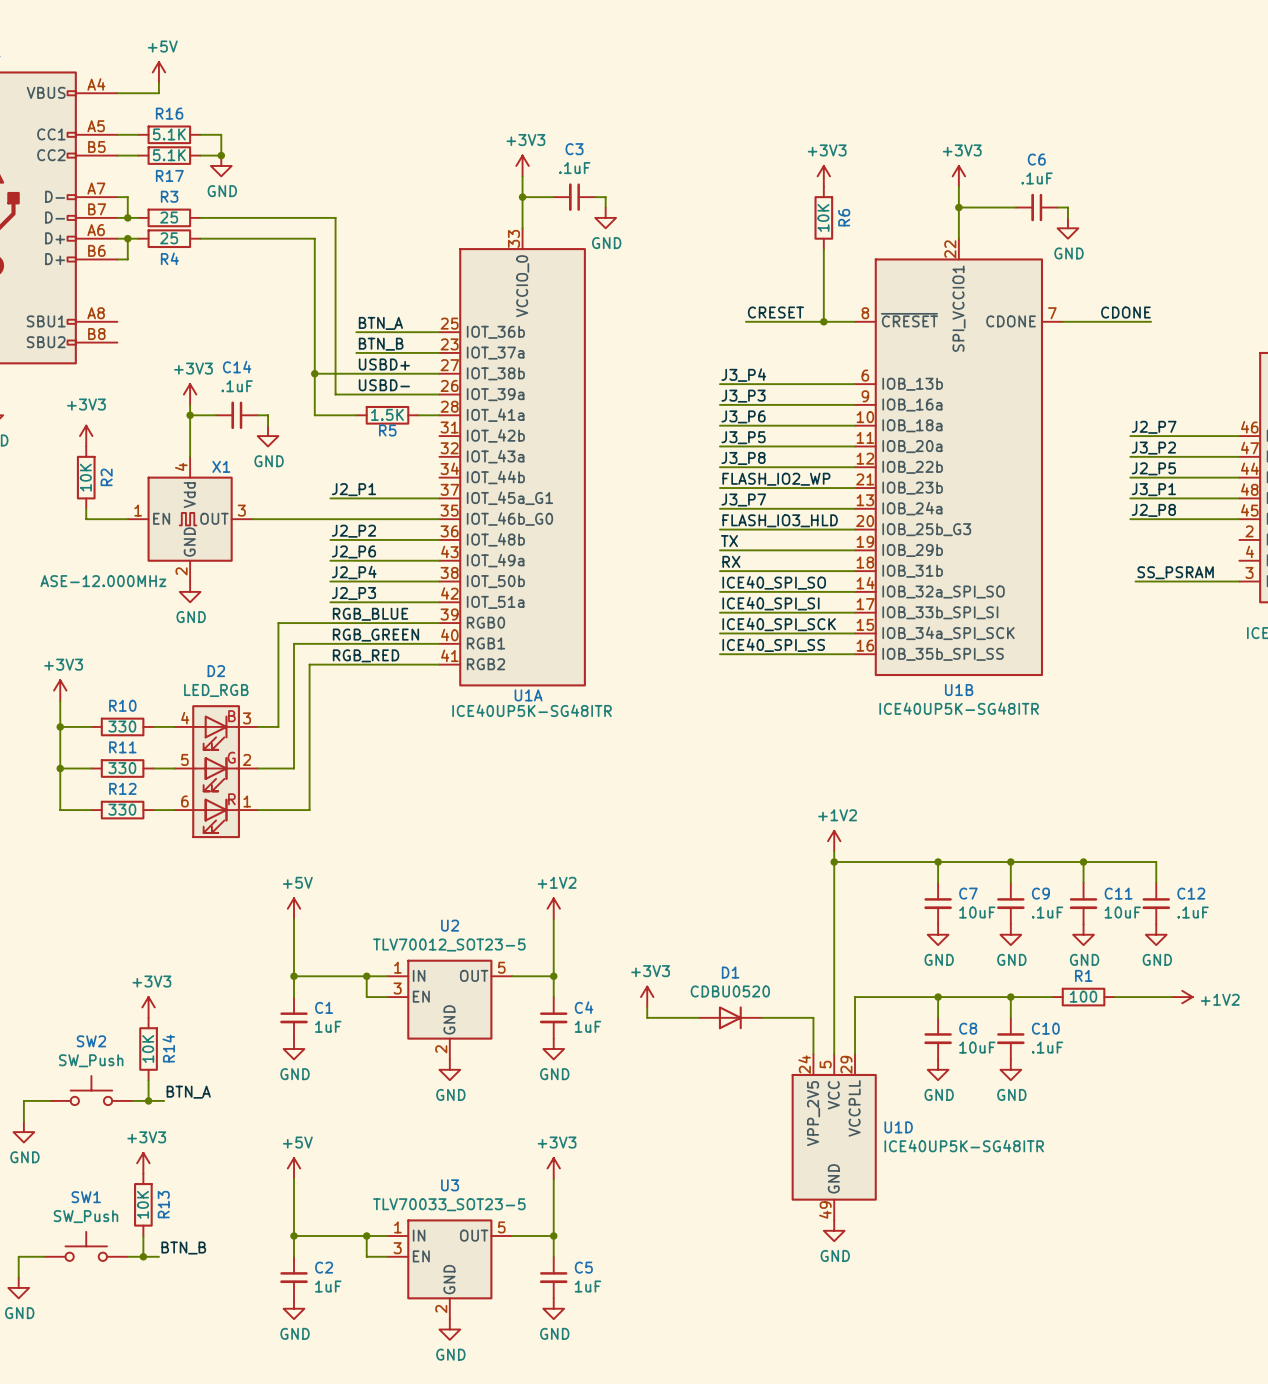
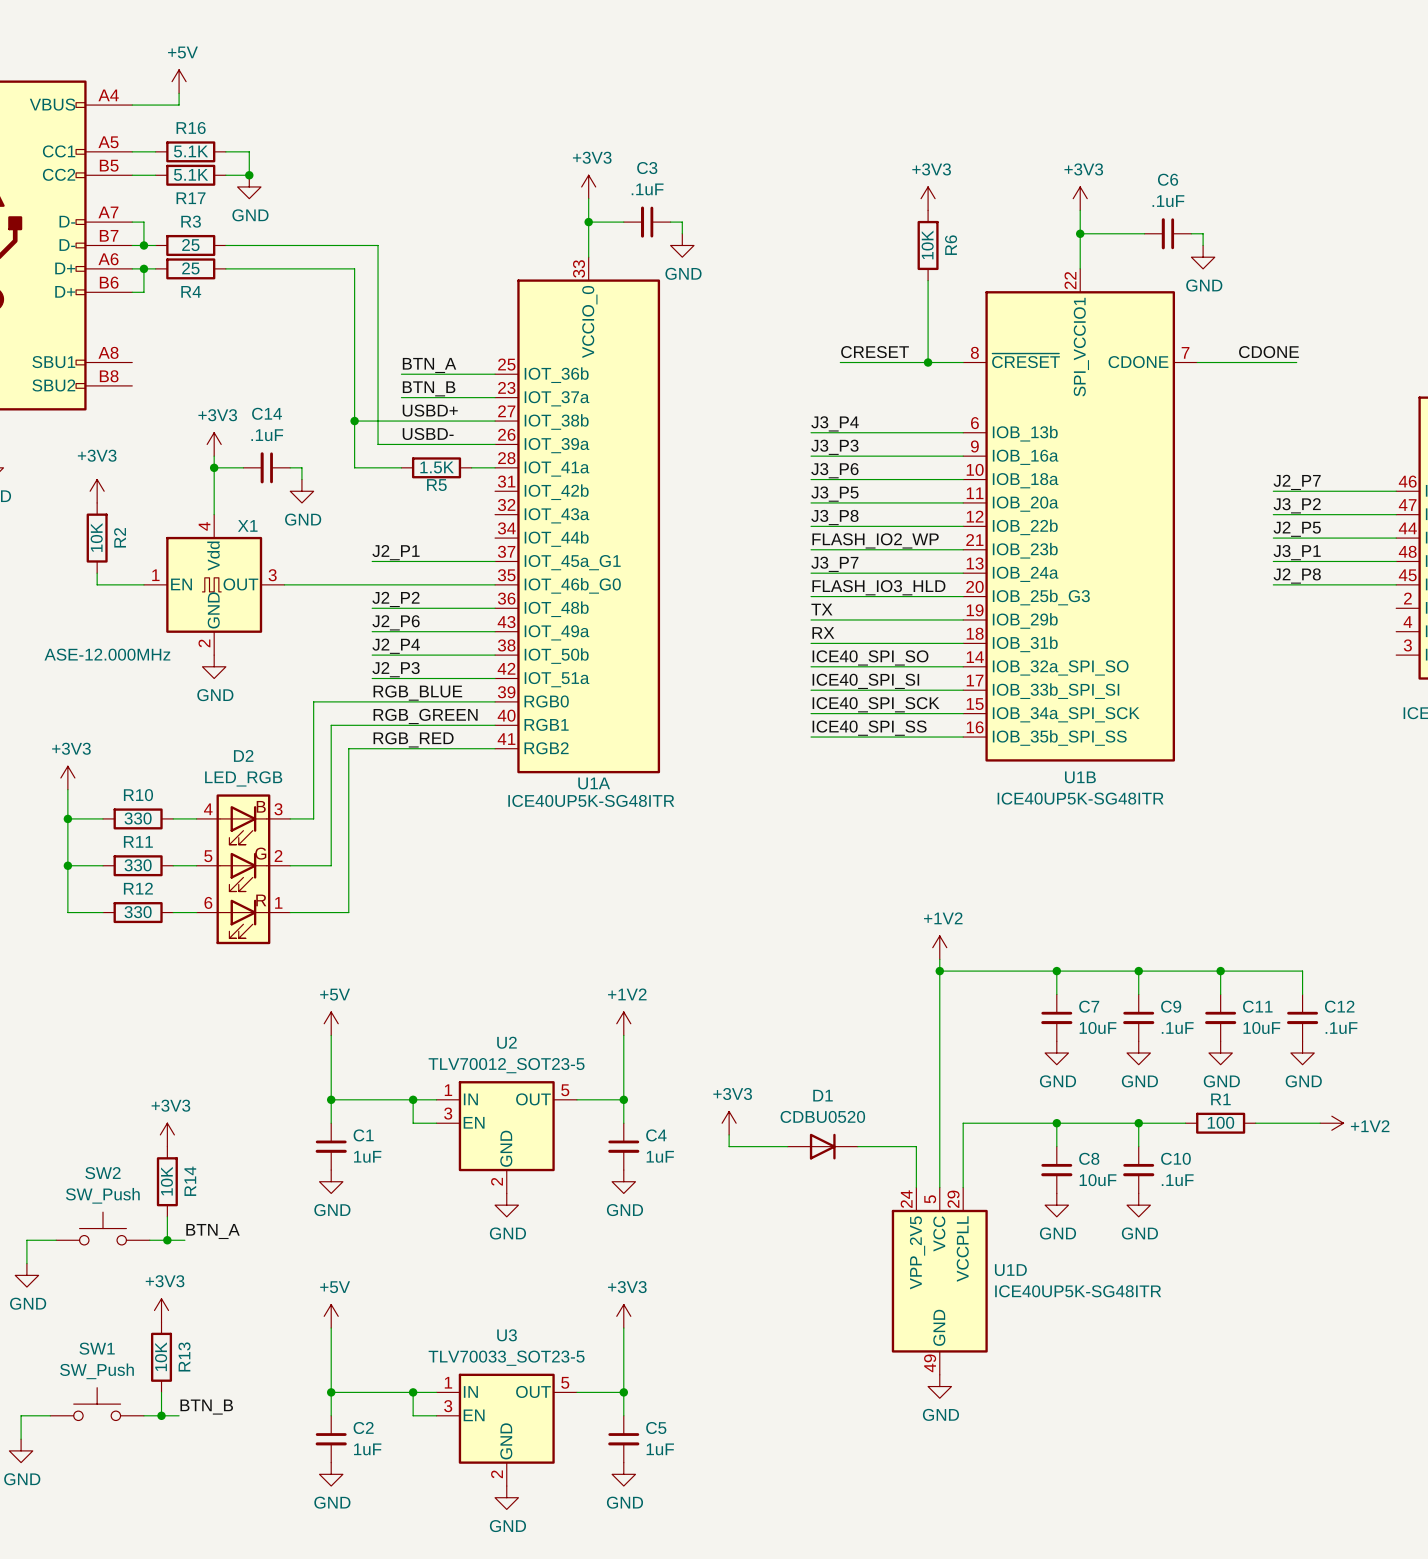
label: SS_PSRAM (1175, 572) -> none
wire: (1135, 581) (1239, 581) -> none

